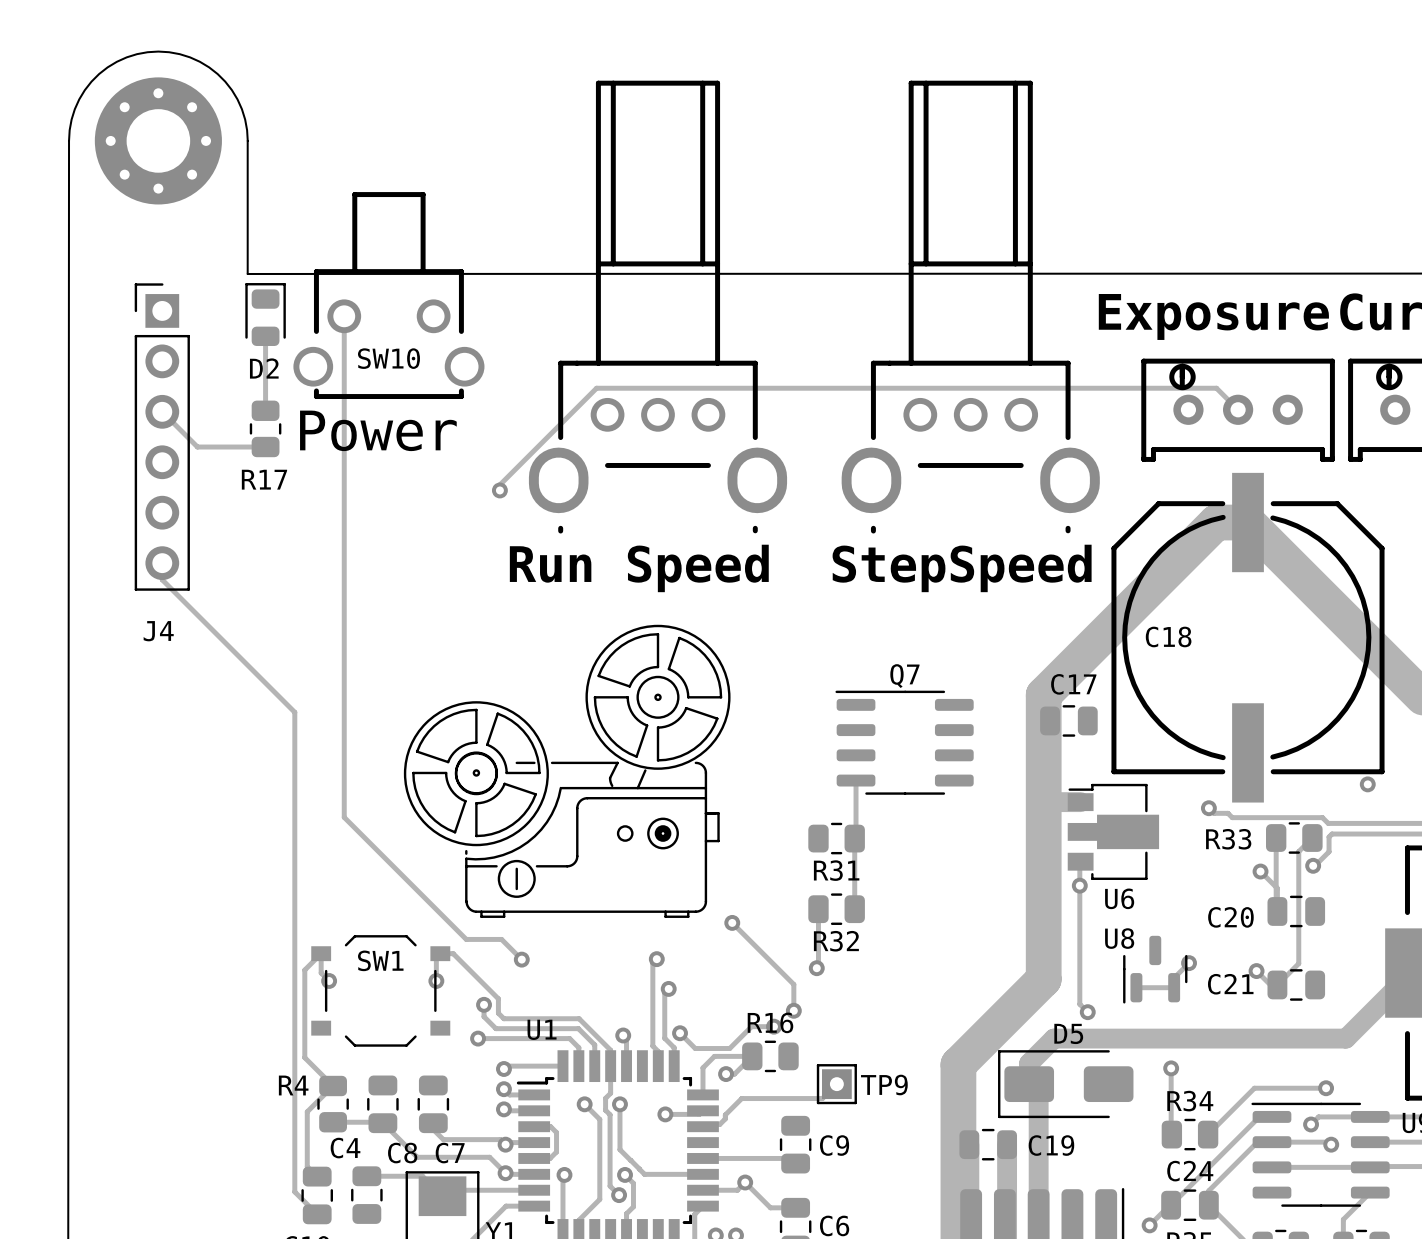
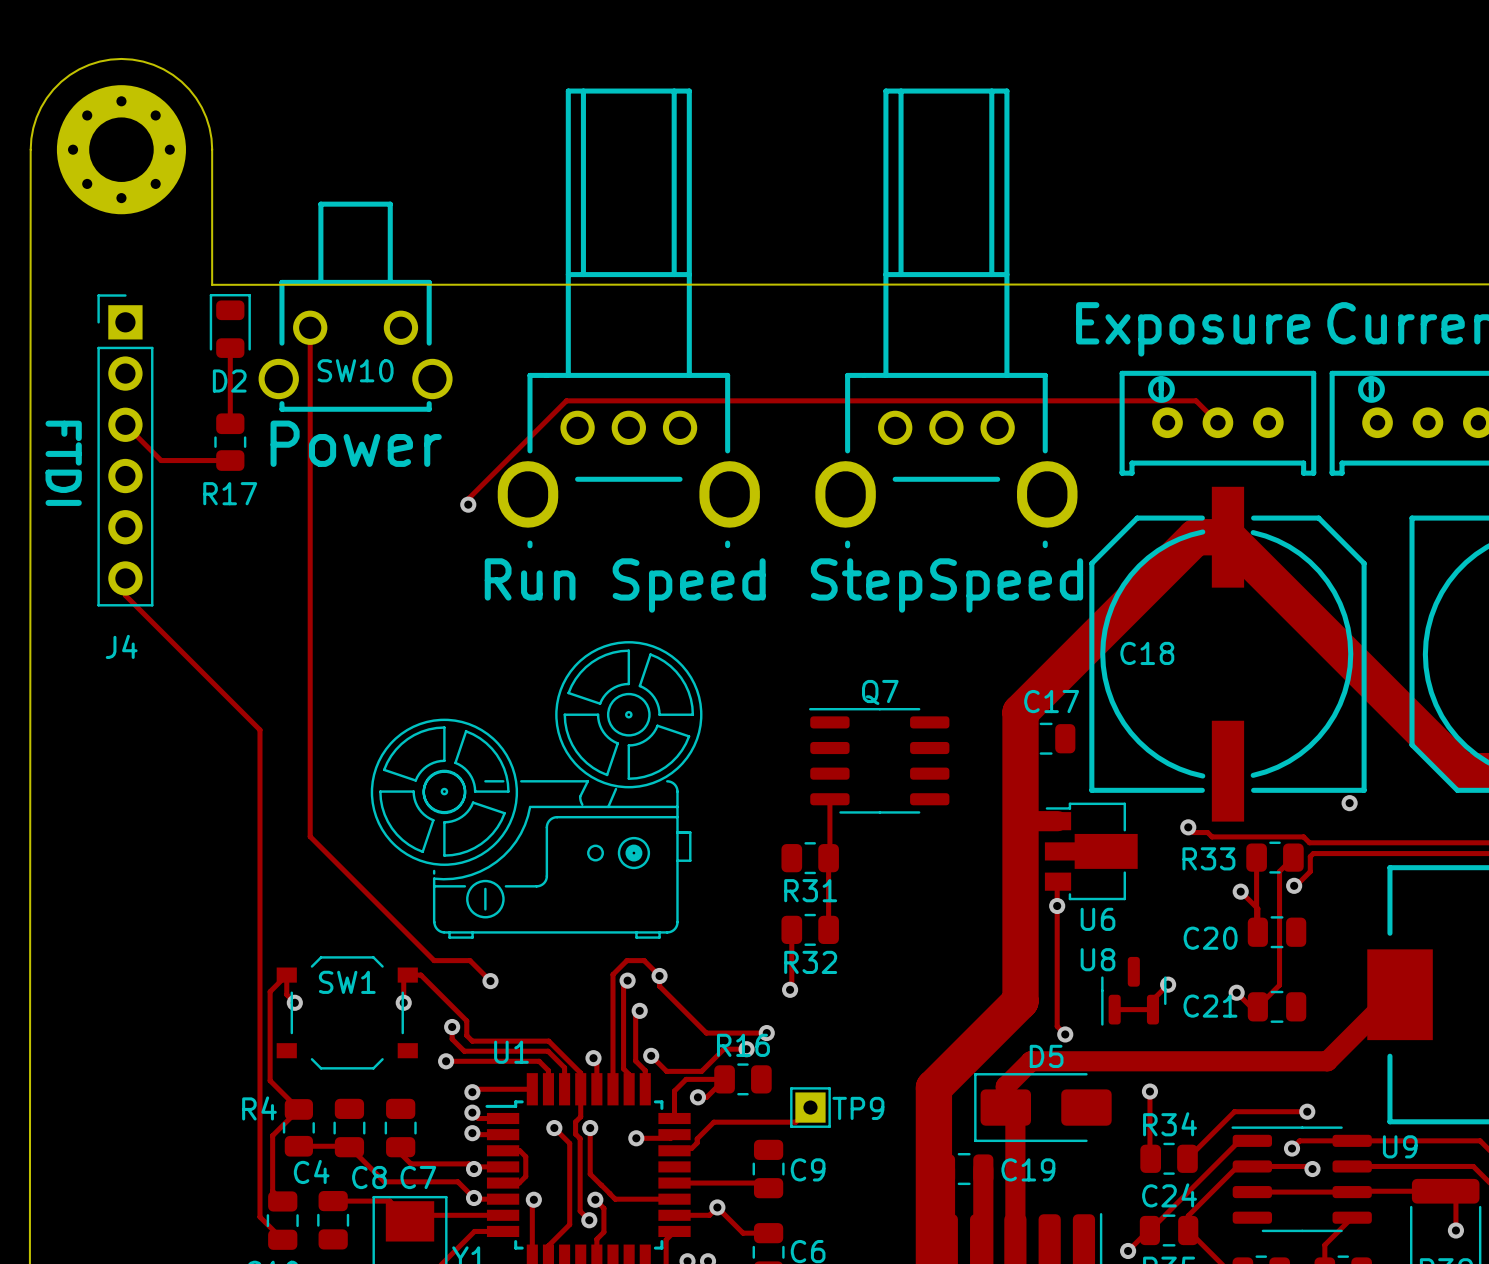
text: none -> FTDI (63, 463)
track: (732, 922) (793, 984) (793, 1010) -> (613, 1089) (613, 974) (626, 960) (644, 960) (659, 975) (659, 986) (706, 1033) (766, 1033)
via position: (732, 922) -> (659, 975)

